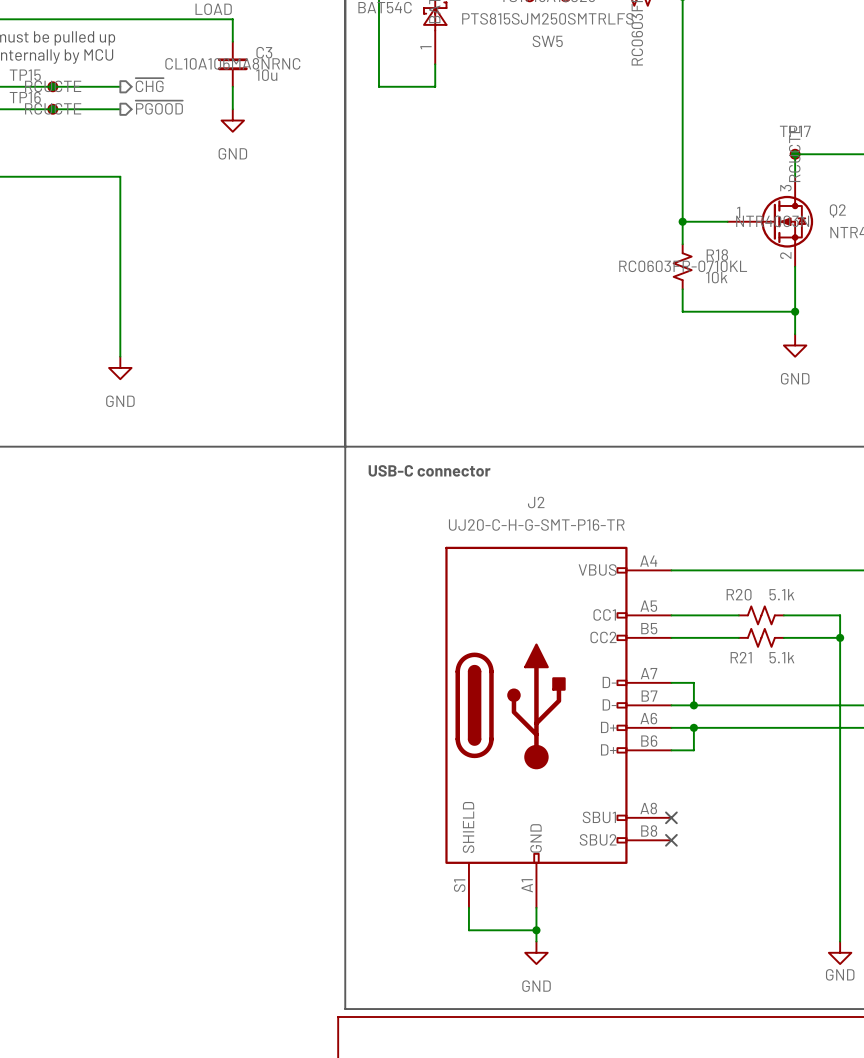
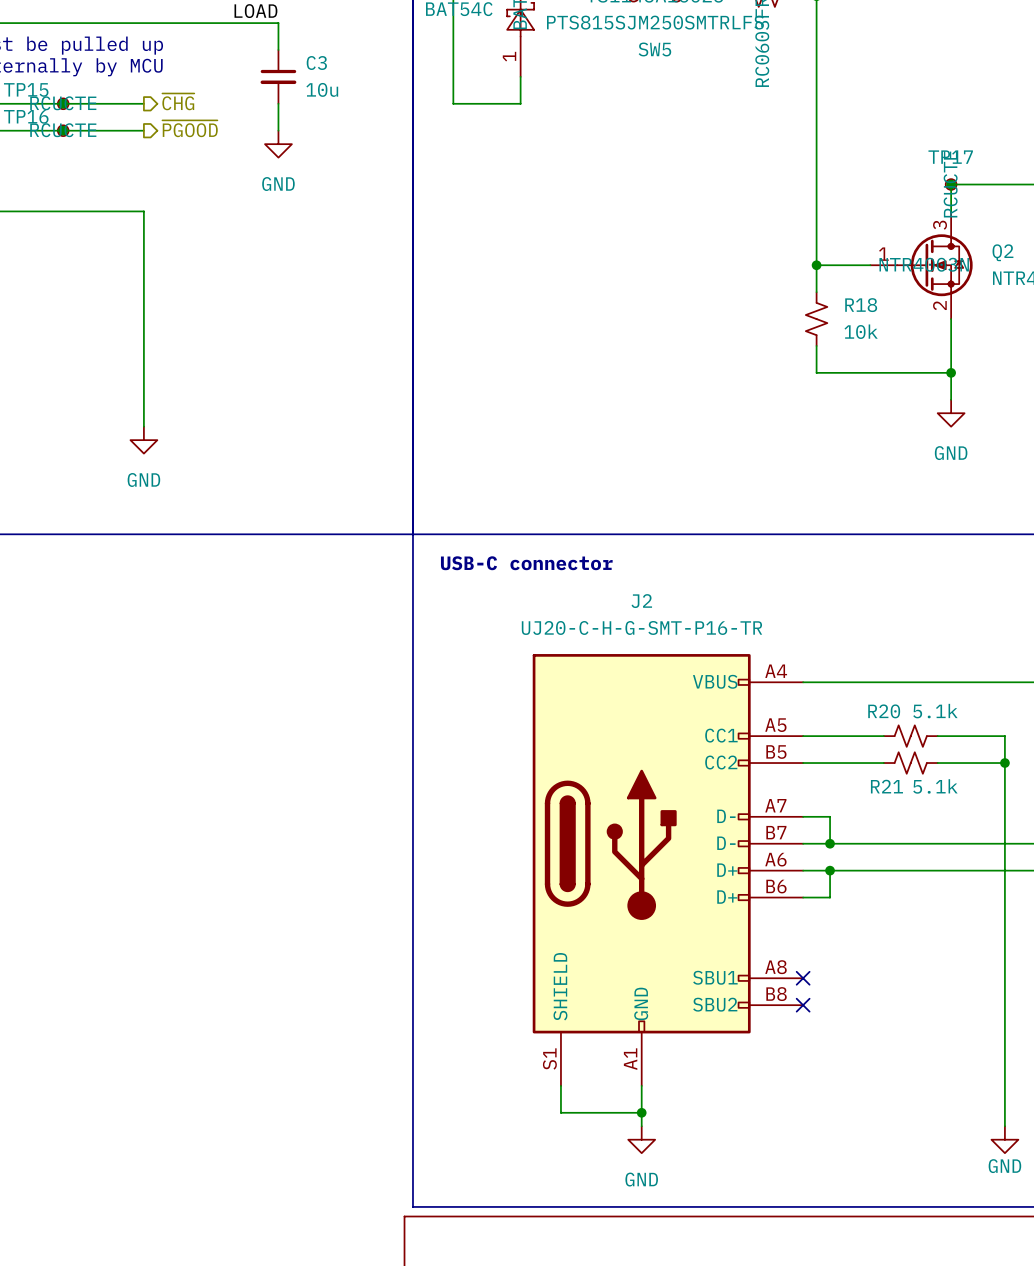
C3 text: CL10A106MA8NRNC (232, 63) -> none
R18 text: RC0603FR-0710KL (683, 266) -> none

